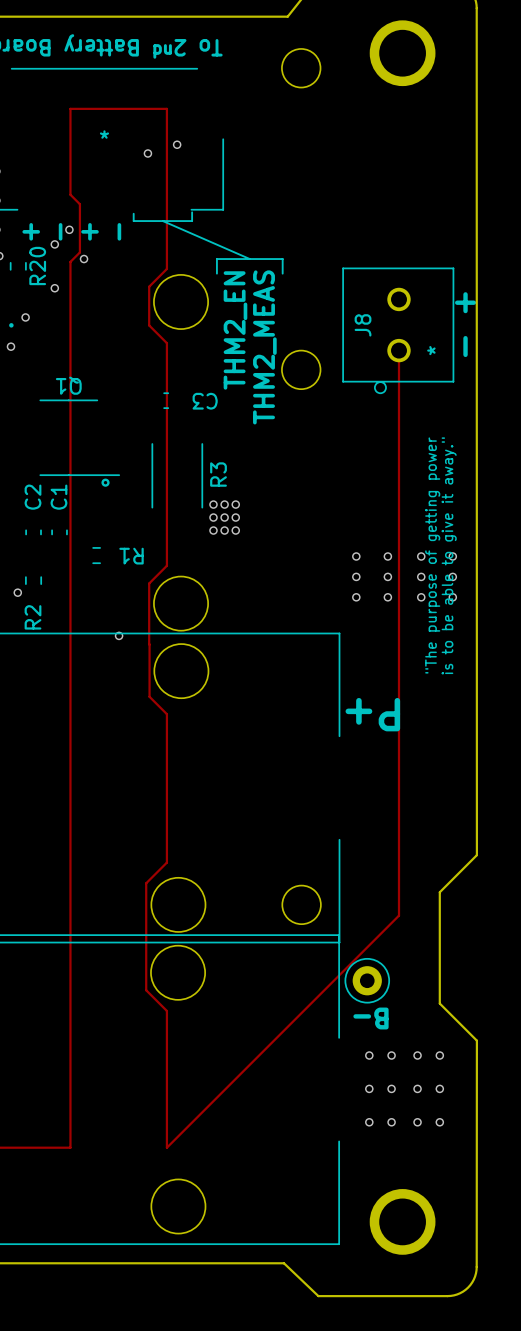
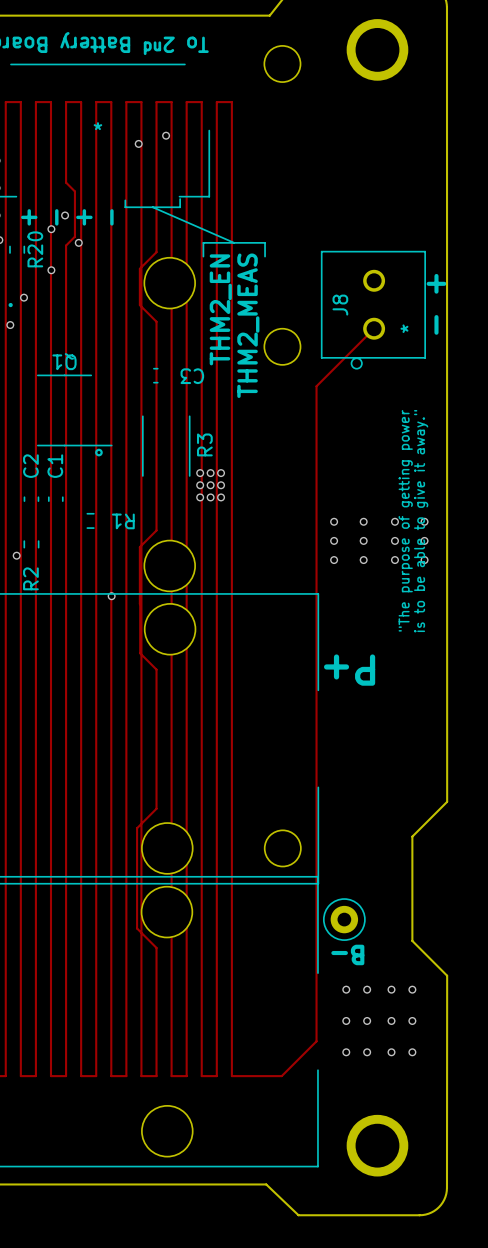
track: (86, 108) (102, 108) -> (81, 102) (81, 1076) (96, 1076) (96, 102)
track: (118, 108) (134, 108) -> (111, 102) (111, 1076) (126, 1076) (126, 102)
track: (150, 108) (166, 108) -> (374, 328) (316, 386) (316, 1041) (281, 1076) (231, 1076) (231, 102) (216, 102) (216, 1076) (201, 1076) (201, 102) (186, 102) (186, 1076) (171, 1076) (171, 102) (156, 102)
track: (398, 350) (398, 915) (166, 1147) -> (141, 102) (141, 1076) (156, 1076)
track: (6, 1147) (22, 1147) -> (5, 1076) (5, 102) (20, 102) (20, 1076)
track: (38, 1147) (54, 1147) -> (35, 1076) (35, 102) (50, 102) (50, 1076)

